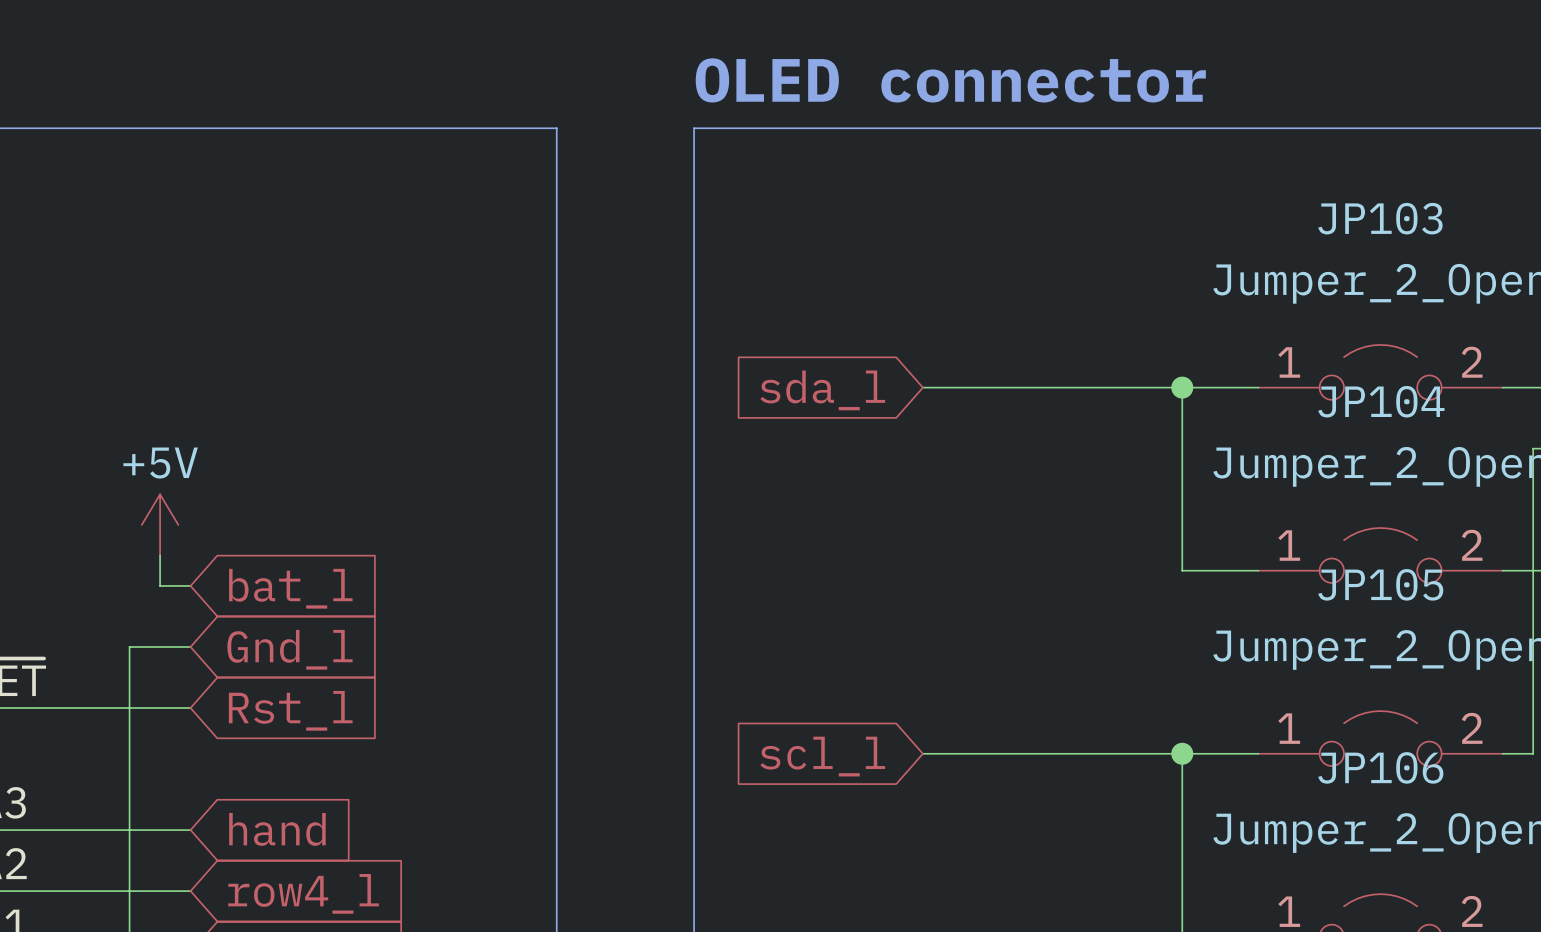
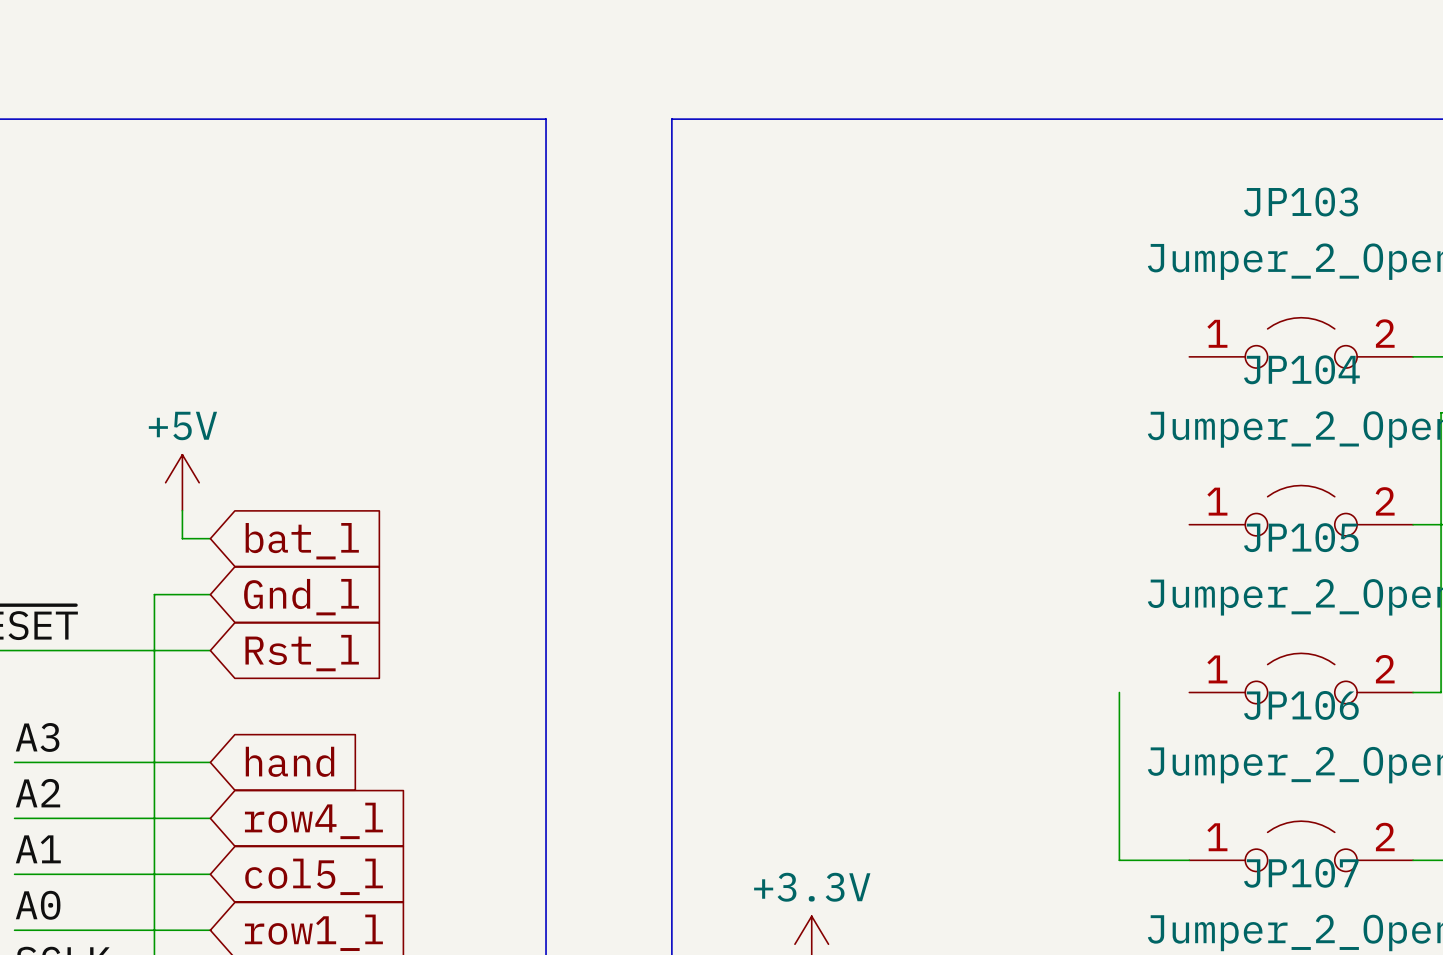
text: OLED connector (950, 80) -> none
wire: (922, 387) (1258, 387) -> none
wire: (1182, 387) (1182, 570) (1258, 570) -> none
junction: (1182, 387) -> none
global label: sda_l (822, 390) -> none
wire: (922, 753) (1258, 753) -> none
junction: (1182, 753) -> none
global label: scl_l (822, 756) -> none

